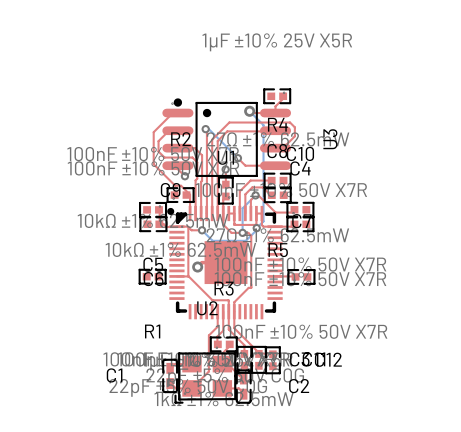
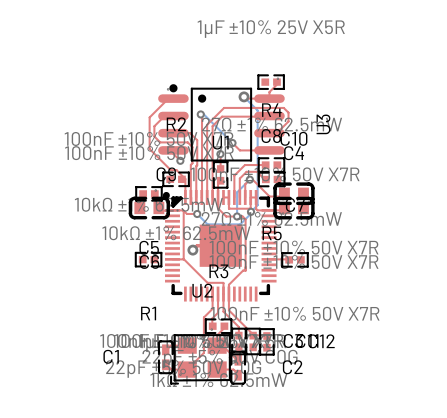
C10 footprint: [286, 201, 315, 218] -> [273, 182, 315, 206]
C6 footprint: [139, 216, 168, 233] -> [128, 196, 170, 220]
C4 footprint: [286, 216, 315, 233] -> [273, 196, 315, 220]

